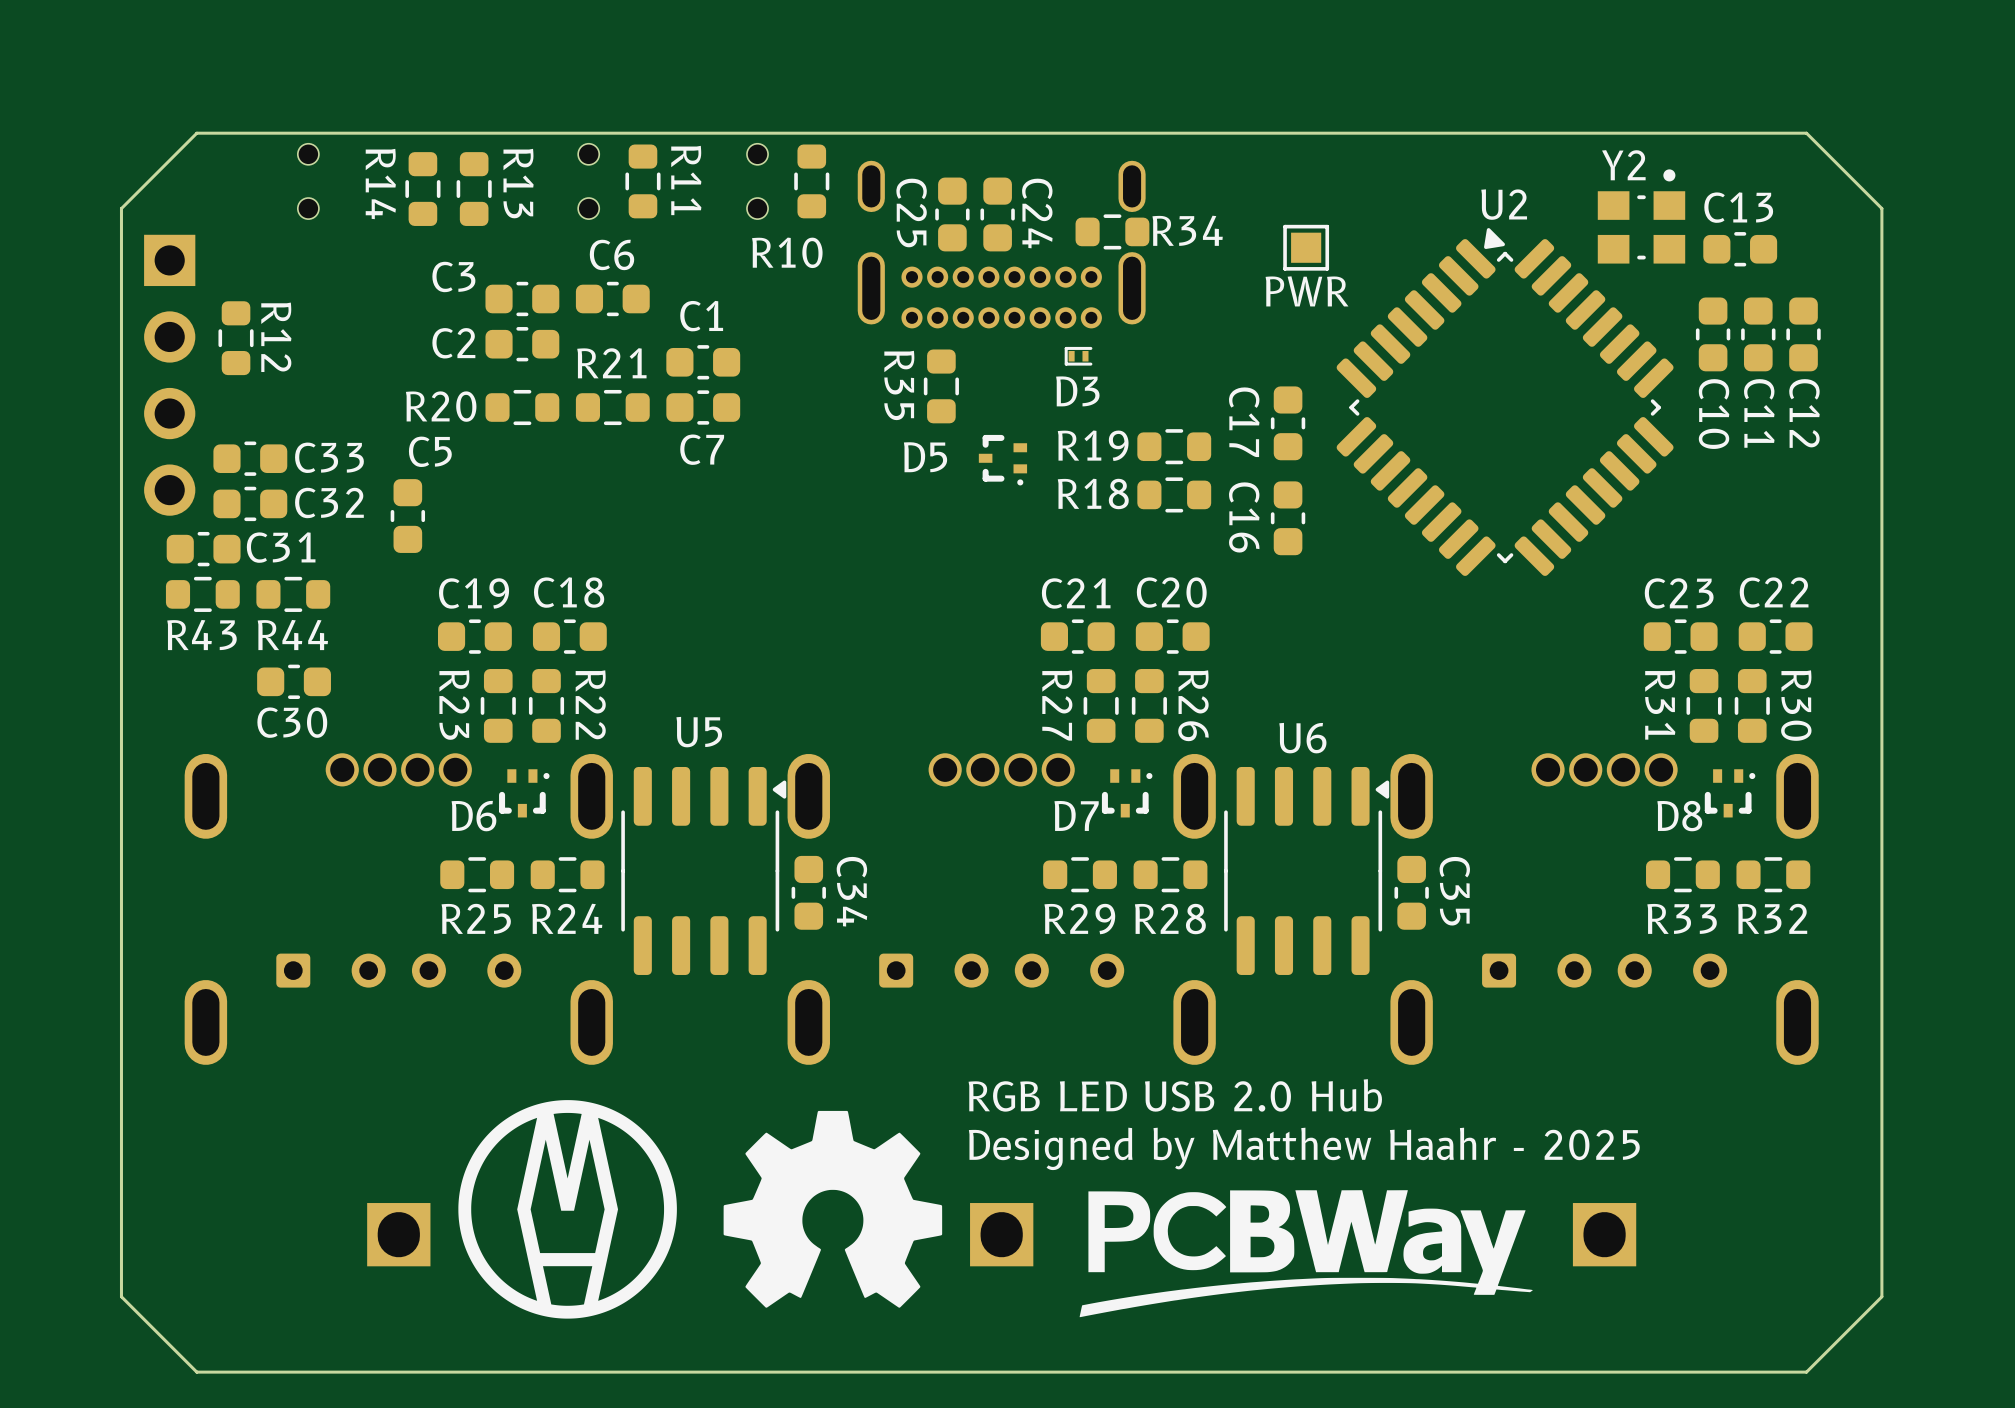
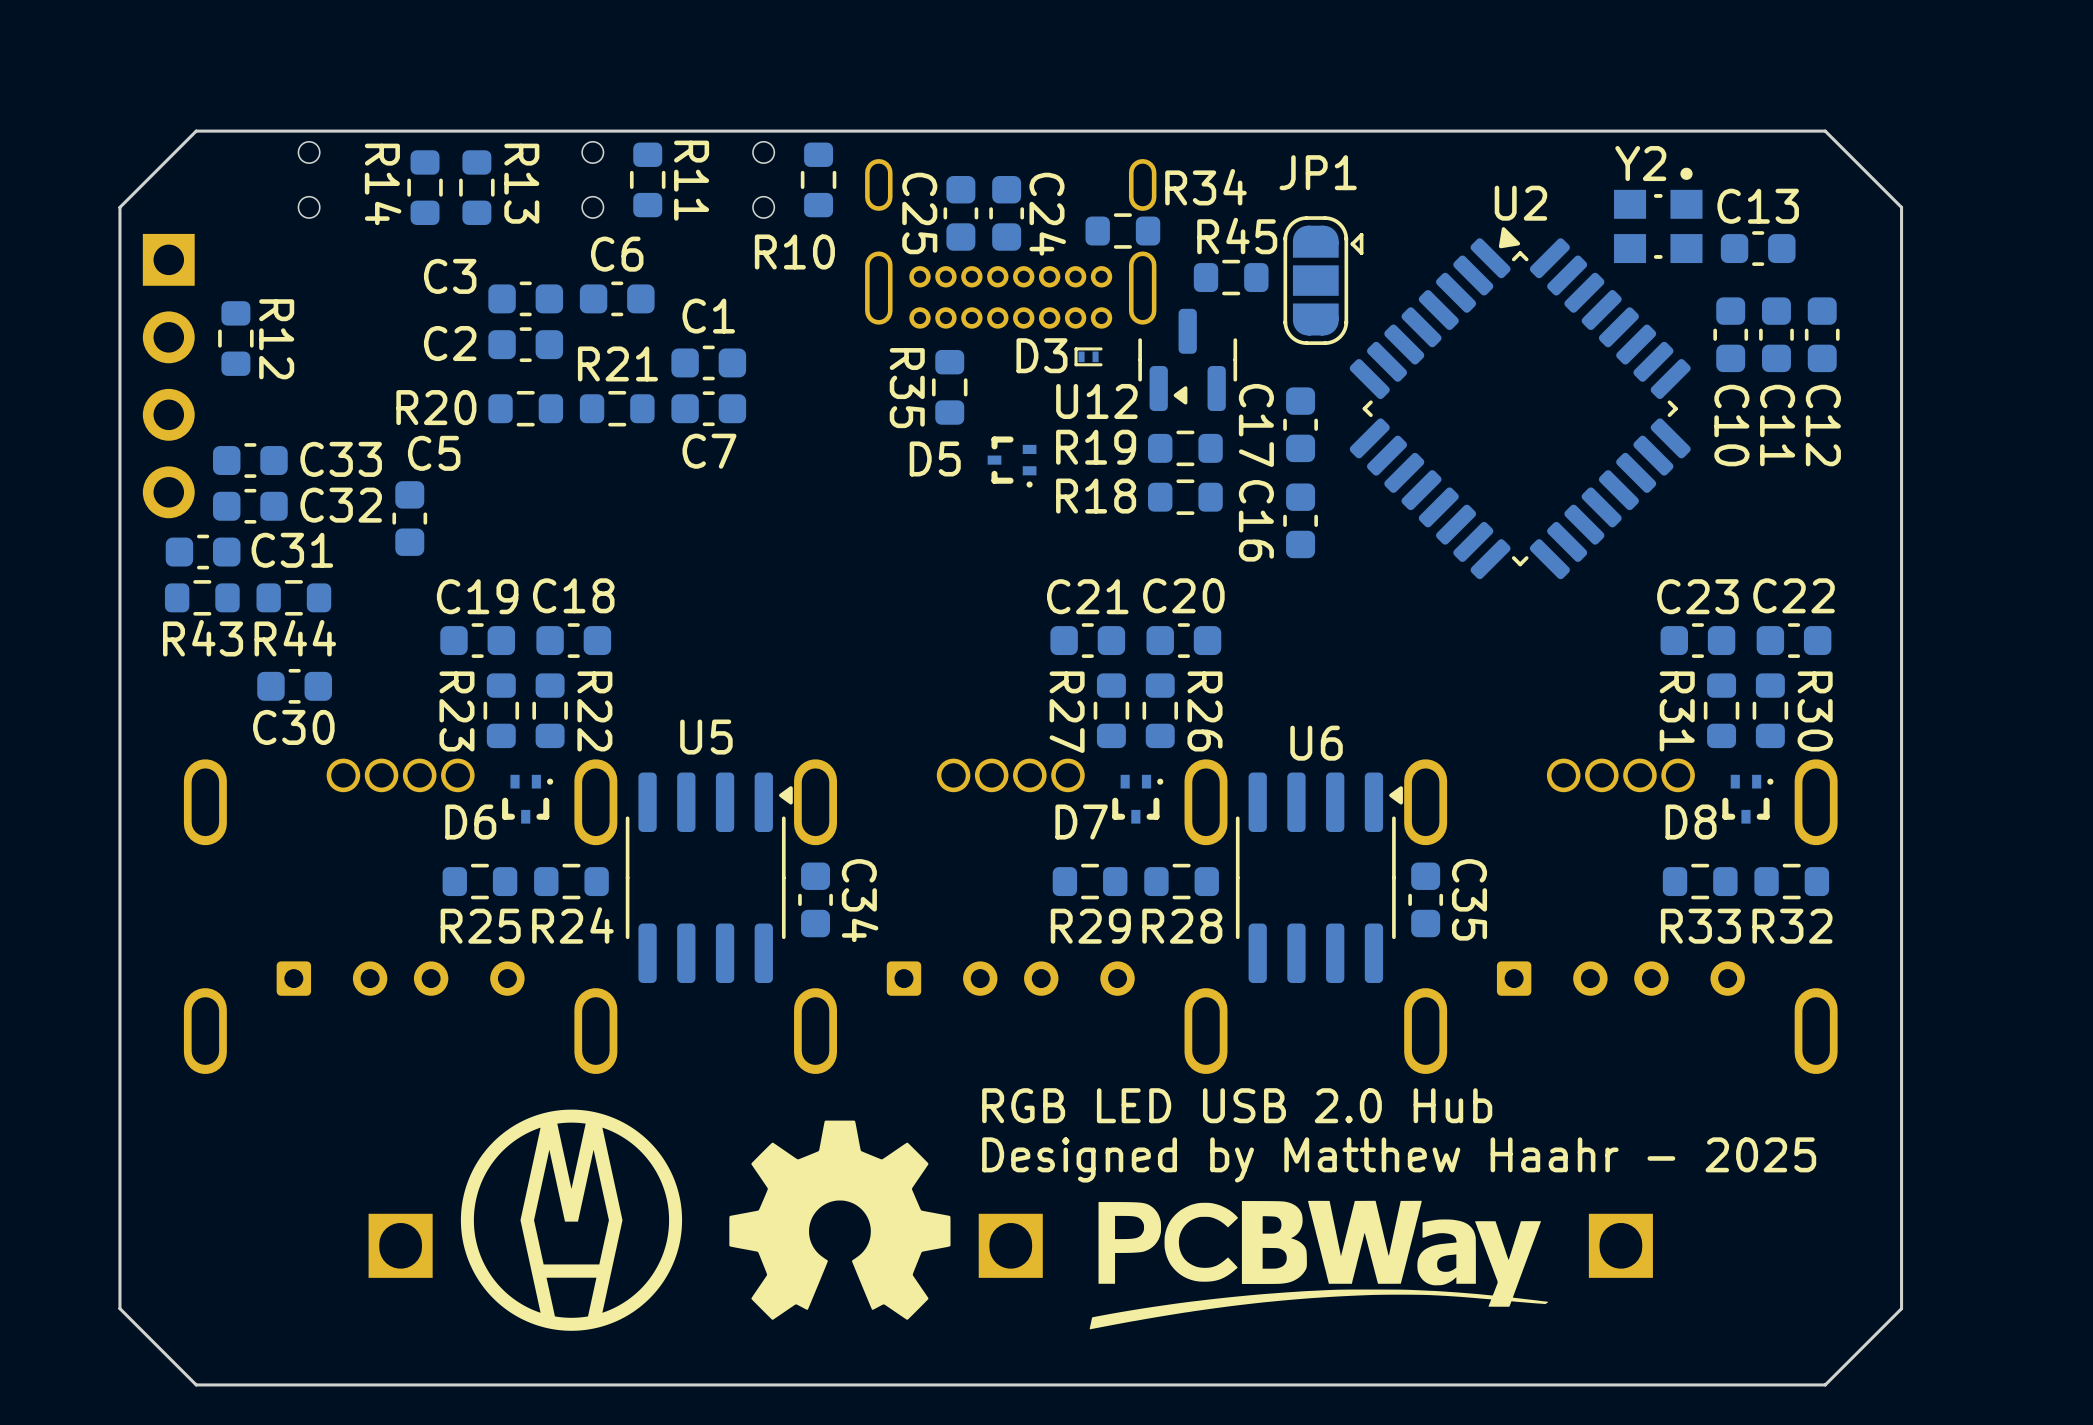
R34 name position: R34 (1187, 230) -> R34 (1205, 187)
part: PWR (1306, 247) -> none
R45: none -> (1231, 277)
JP1: none -> (1323, 280)
U12: none -> (1187, 359)
D3 name position: D3 (1077, 391) -> D3 (1041, 355)

